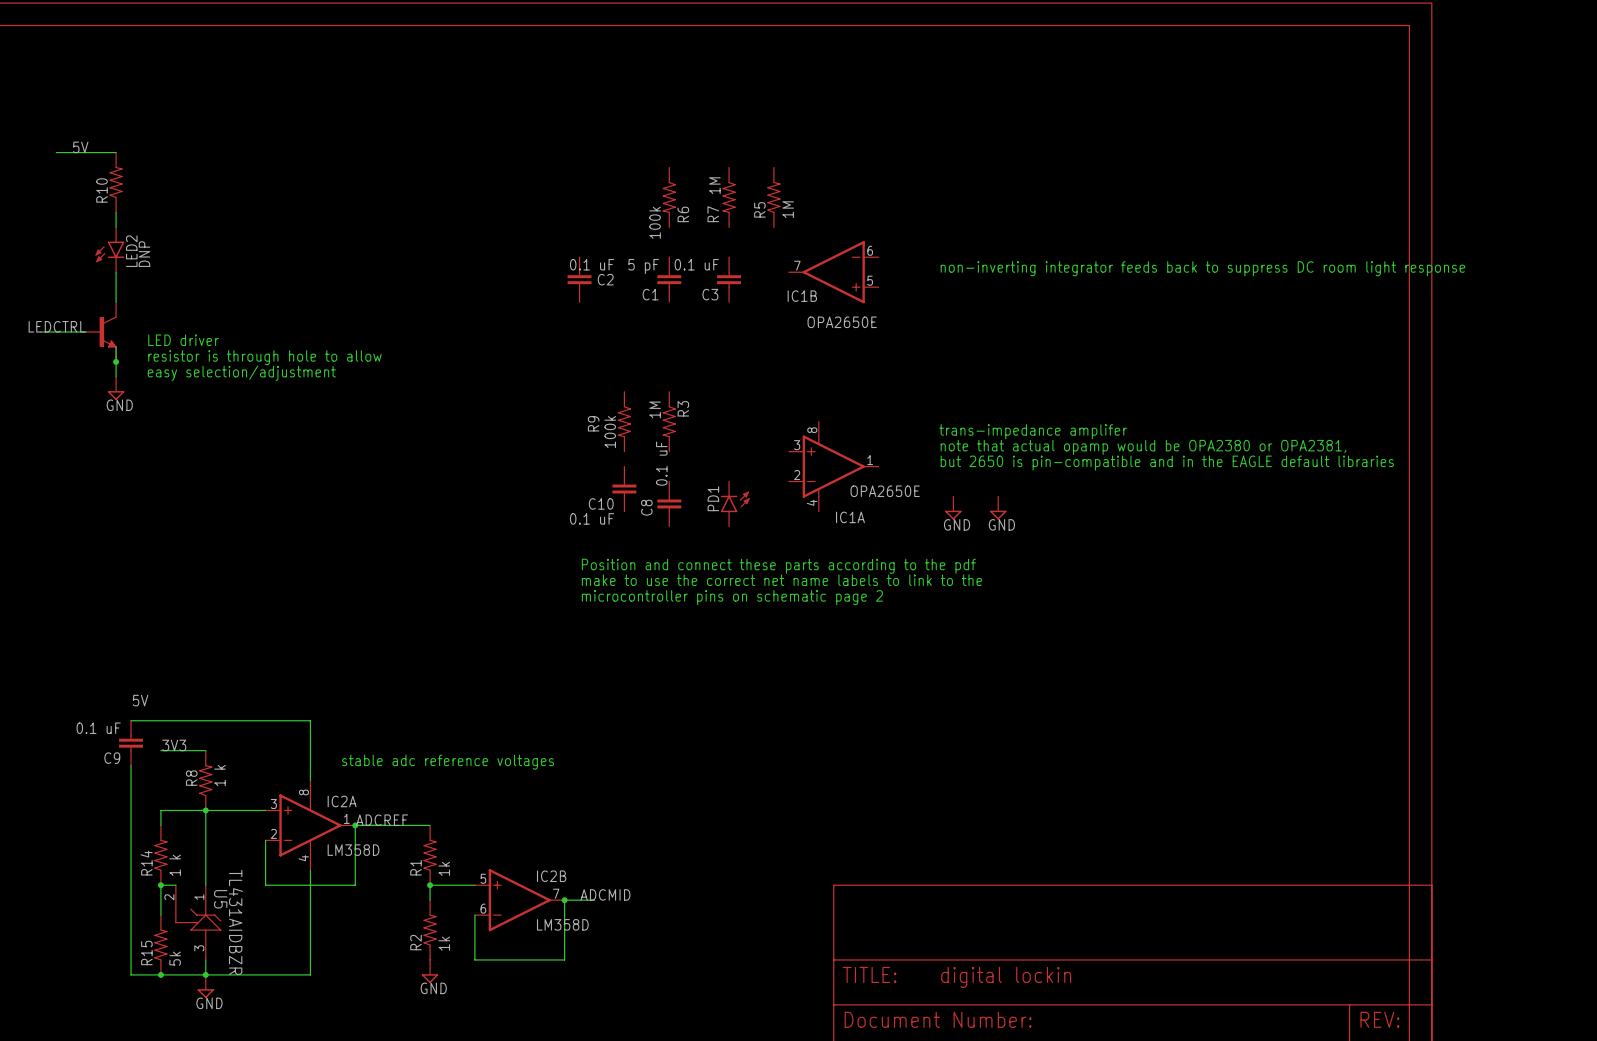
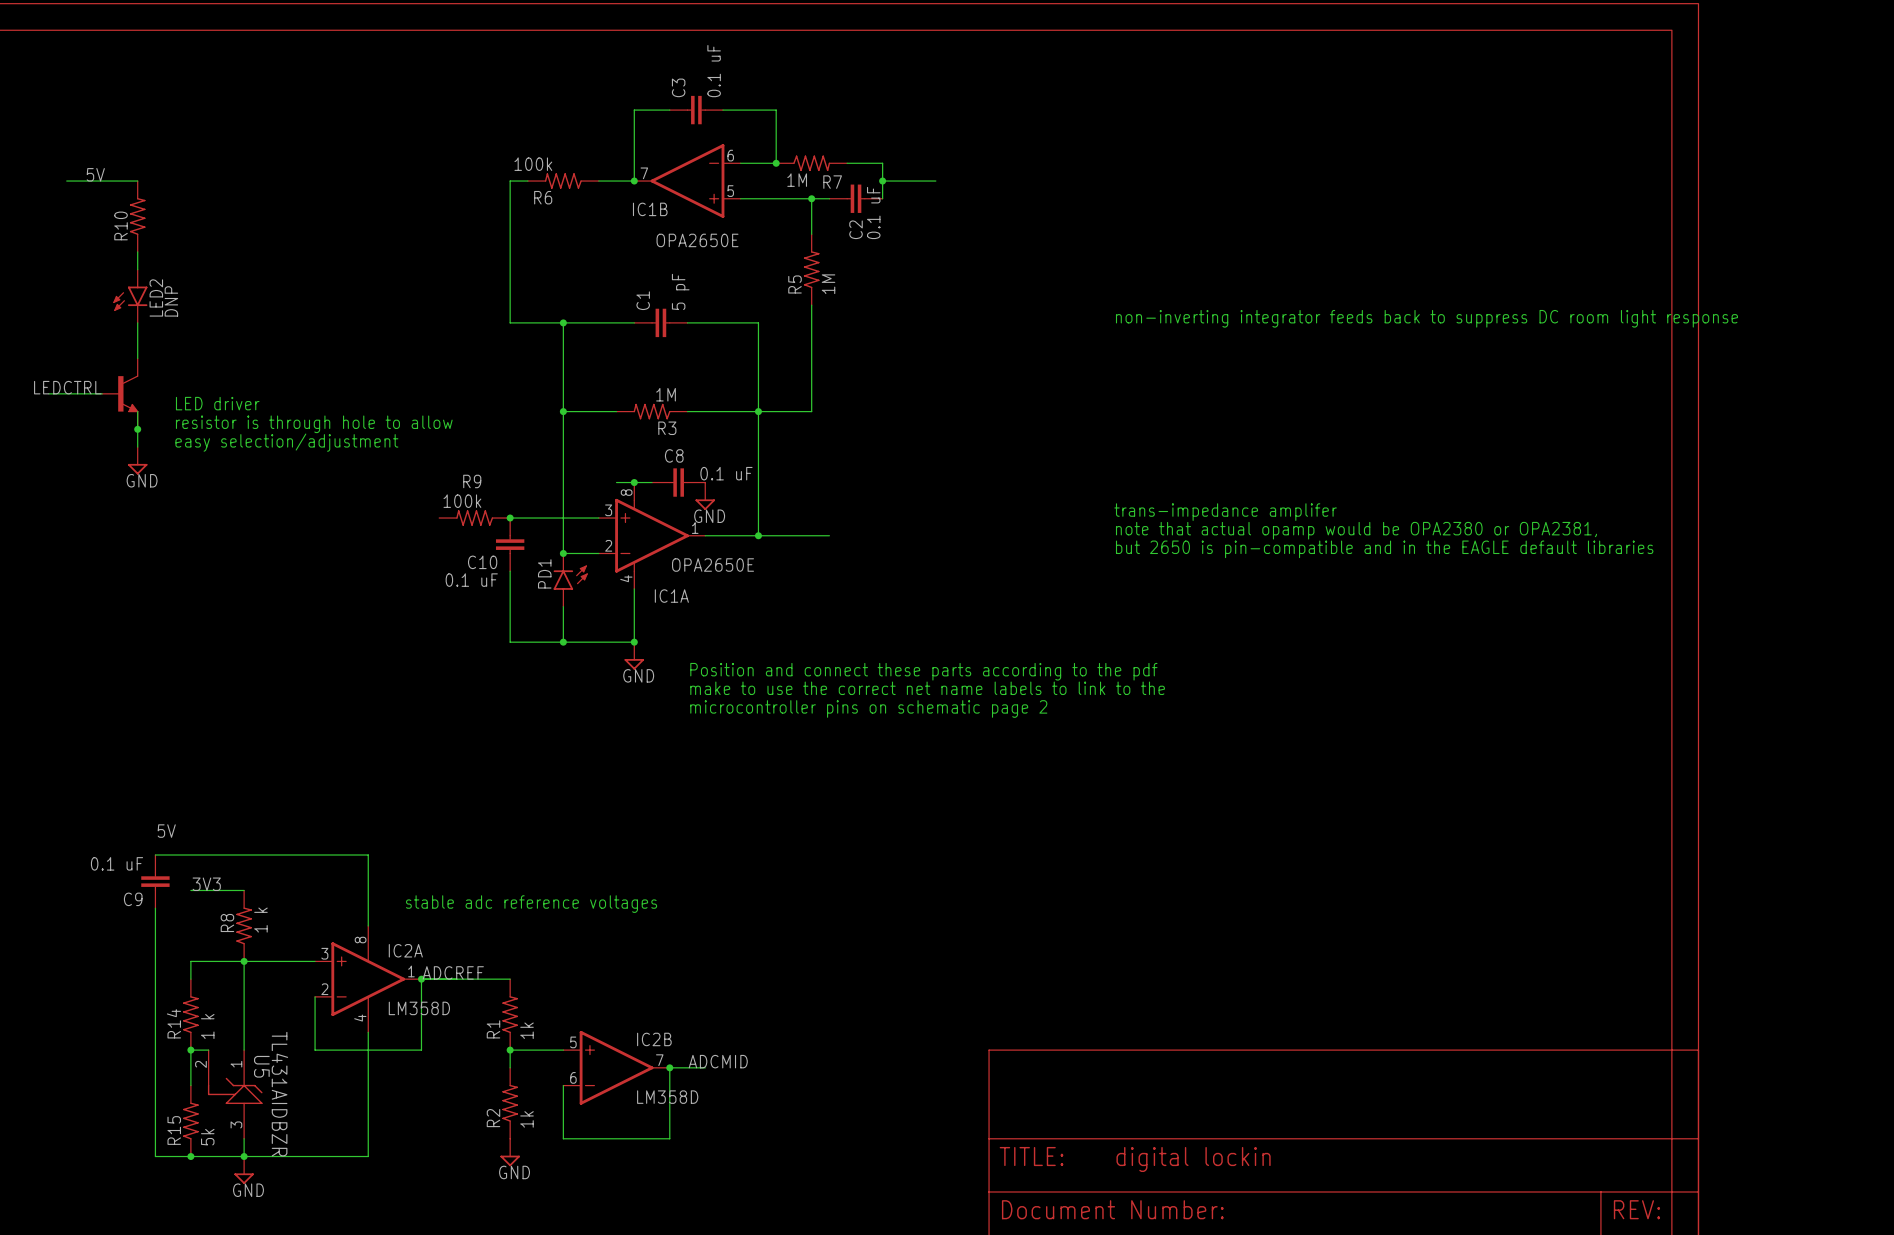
wire: none -> (669, 110) (634, 110) (634, 181) (598, 181)
wire: none -> (722, 110) (776, 110) (776, 163) (740, 163)
junction: none -> (776, 163)
wire: none -> (847, 163) (882, 163) (882, 198)
wire: none -> (527, 181) (510, 181) (510, 322) (634, 322)
junction: none -> (634, 181)
wire: none -> (882, 181) (935, 181)
junction: none -> (882, 181)
wire: none -> (740, 198) (829, 198)
wire: none -> (811, 198) (811, 234)
junction: none -> (811, 198)
R6 rotation: 0° (669, 197) -> 90° clockwise (563, 181)
R6 position: (669, 197) -> (563, 181)
R7 rotation: 0° (729, 197) -> 90° counterclockwise (811, 163)
R7 position: (729, 197) -> (811, 163)
R5 position: (773, 197) -> (811, 269)
wire: none -> (811, 305) (811, 411) (687, 411)
wire: none -> (563, 322) (563, 553) (598, 553)
junction: none -> (563, 322)
wire: none -> (687, 322) (758, 322) (758, 535)
IC1B position: (833, 272) -> (687, 181)
C2 rotation: 0° (579, 279) -> 90° clockwise (856, 198)
C2 position: (579, 279) -> (856, 198)
C1 rotation: 0° (669, 279) -> 90° clockwise (660, 322)
C1 position: (669, 279) -> (660, 322)
C3 rotation: 0° (729, 279) -> 90° clockwise (696, 110)
C3 position: (729, 279) -> (696, 110)
wire: none -> (563, 411) (616, 411)
junction: none -> (563, 411)
junction: none -> (758, 411)
wire: none -> (616, 482) (652, 482)
junction: none -> (634, 482)
power symbol: none -> GND (705, 496)
R9 rotation: 0° (624, 421) -> 90° clockwise (474, 518)
R9 position: (624, 421) -> (474, 518)
R3 rotation: 0° (669, 421) -> 90° clockwise (652, 411)
R3 position: (669, 421) -> (652, 411)
wire: none -> (510, 518) (598, 518)
junction: none -> (510, 518)
wire: none -> (705, 535) (829, 535)
junction: none -> (758, 535)
junction: none -> (563, 553)
IC1A position: (833, 466) -> (652, 535)
wire: none -> (510, 571) (510, 642) (634, 642) (634, 588)
C10 position: (624, 489) -> (510, 544)
C8 rotation: 0° (669, 503) -> 90° clockwise (678, 482)
C8 position: (669, 503) -> (678, 482)
PD1 position: (735, 503) -> (570, 580)
power symbol: GND (953, 508) -> none
power symbol: GND (998, 508) -> none
wire: none -> (563, 606) (563, 642)
junction: none -> (563, 642)
junction: none -> (634, 642)
power symbol: none -> GND (634, 655)

